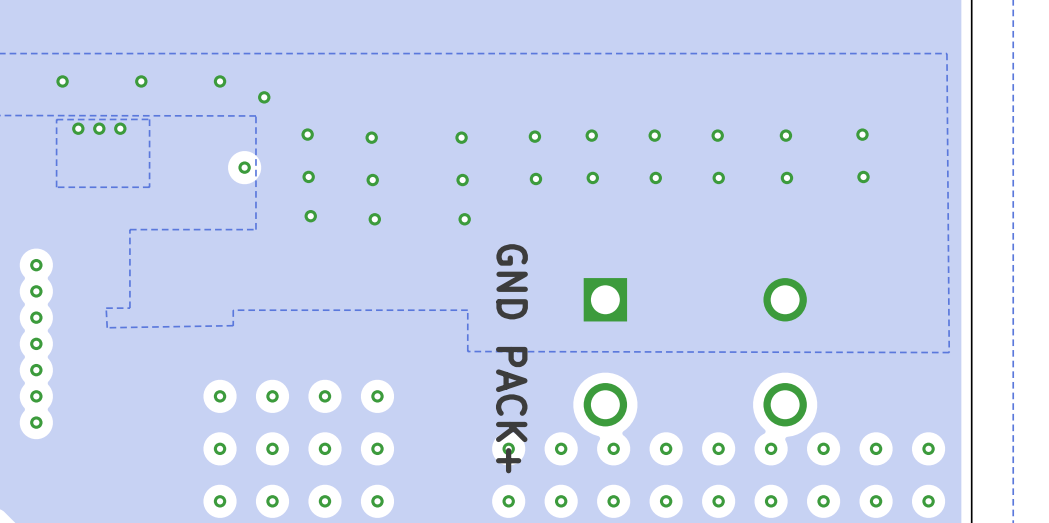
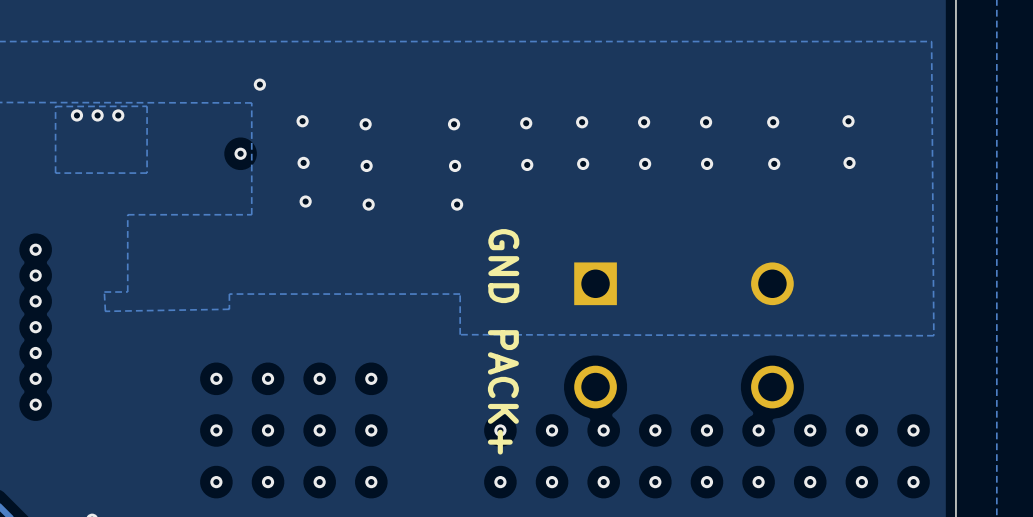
via: (62, 81) -> none
via: (141, 81) -> none
via: (220, 81) -> none

